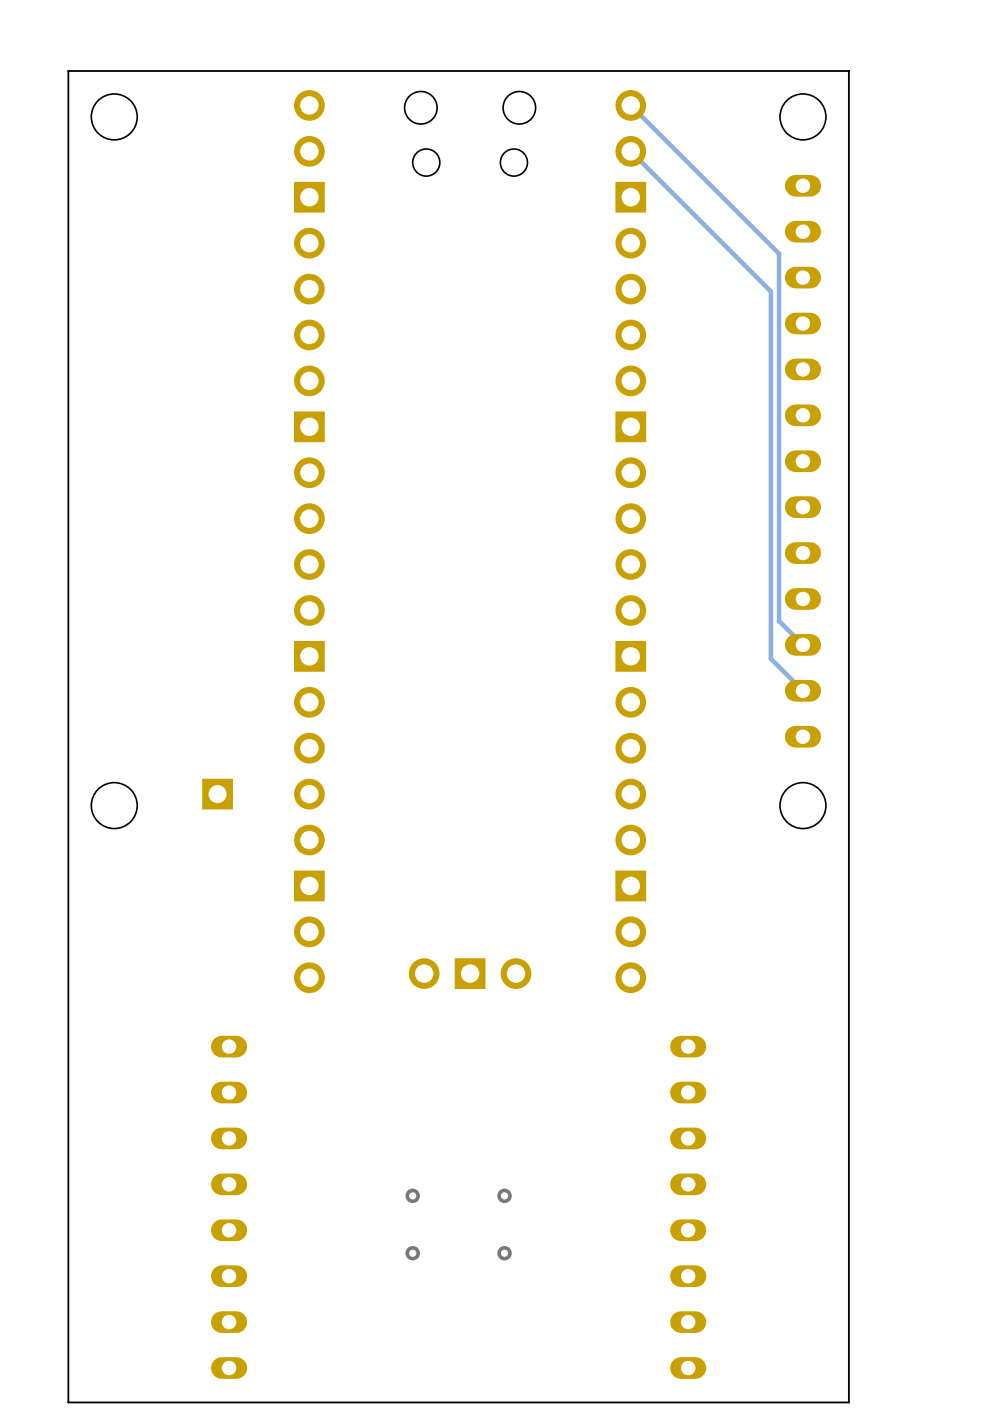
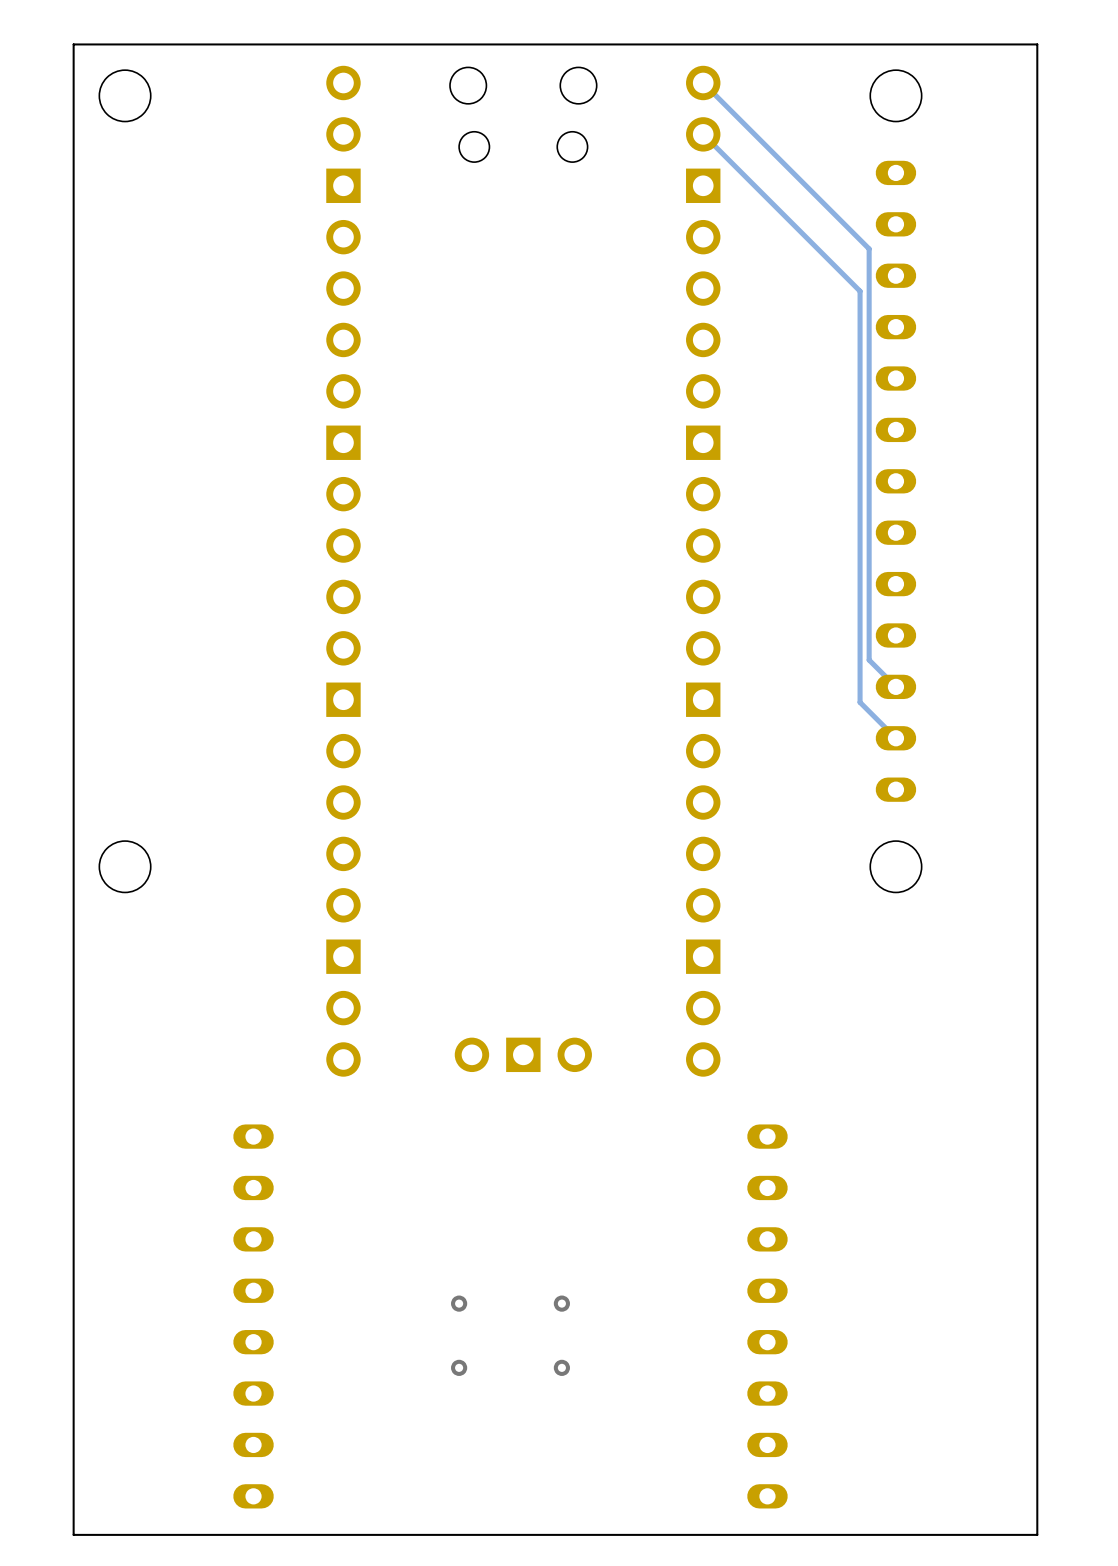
board edge: (848, 70) (848, 1402) -> (947, 44) (1037, 44) (1037, 1534) (947, 1534)
part: (217, 794) -> none

